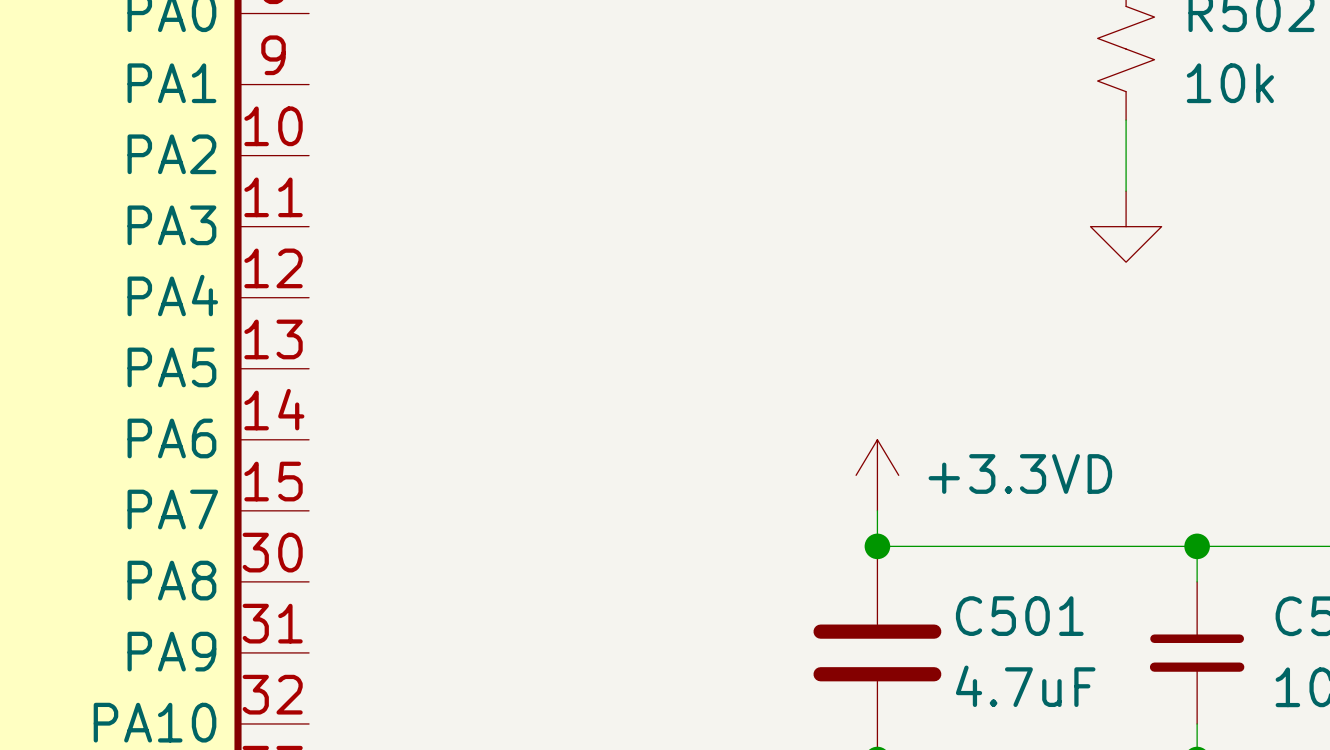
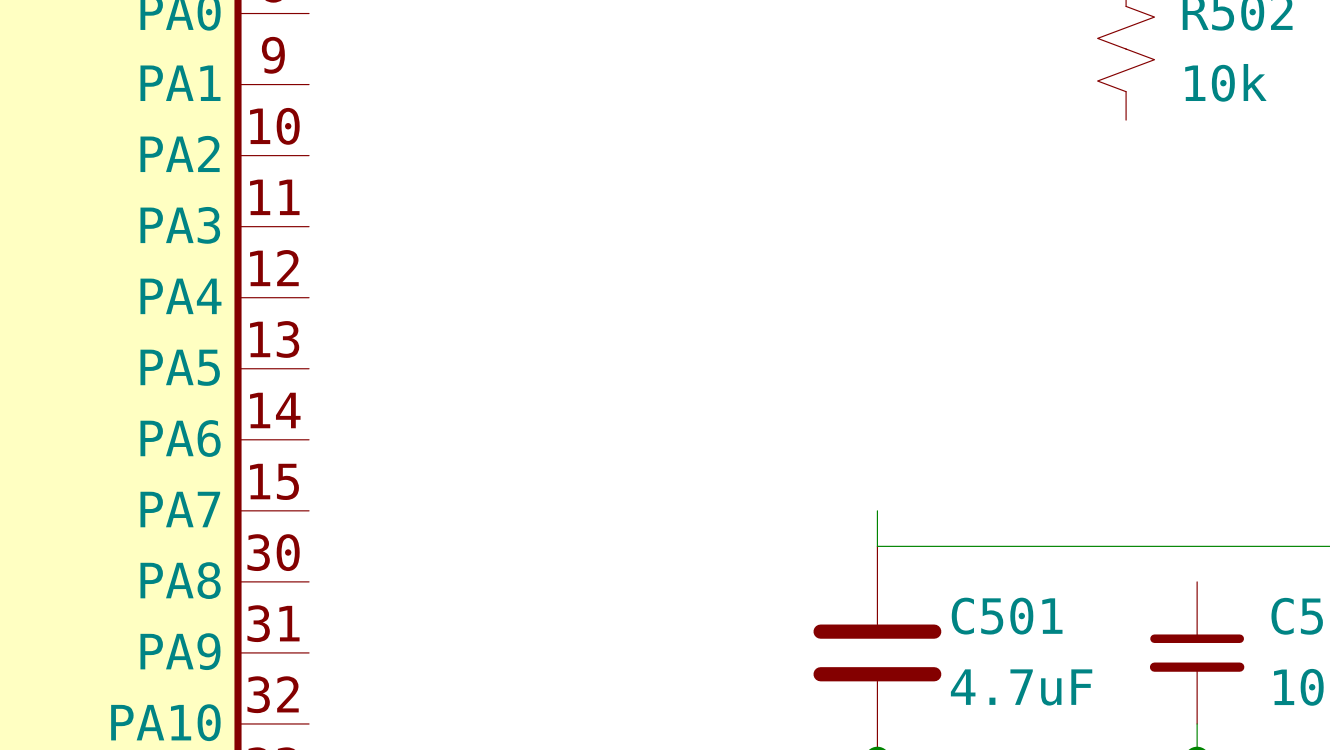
wire: (1126, 120) (1126, 191) -> none
power symbol: (1126, 226) -> none
power symbol: +3.3VD (877, 475) -> none
junction: (877, 546) -> none
wire: (1197, 546) (1197, 581) -> none
junction: (1197, 546) -> none

